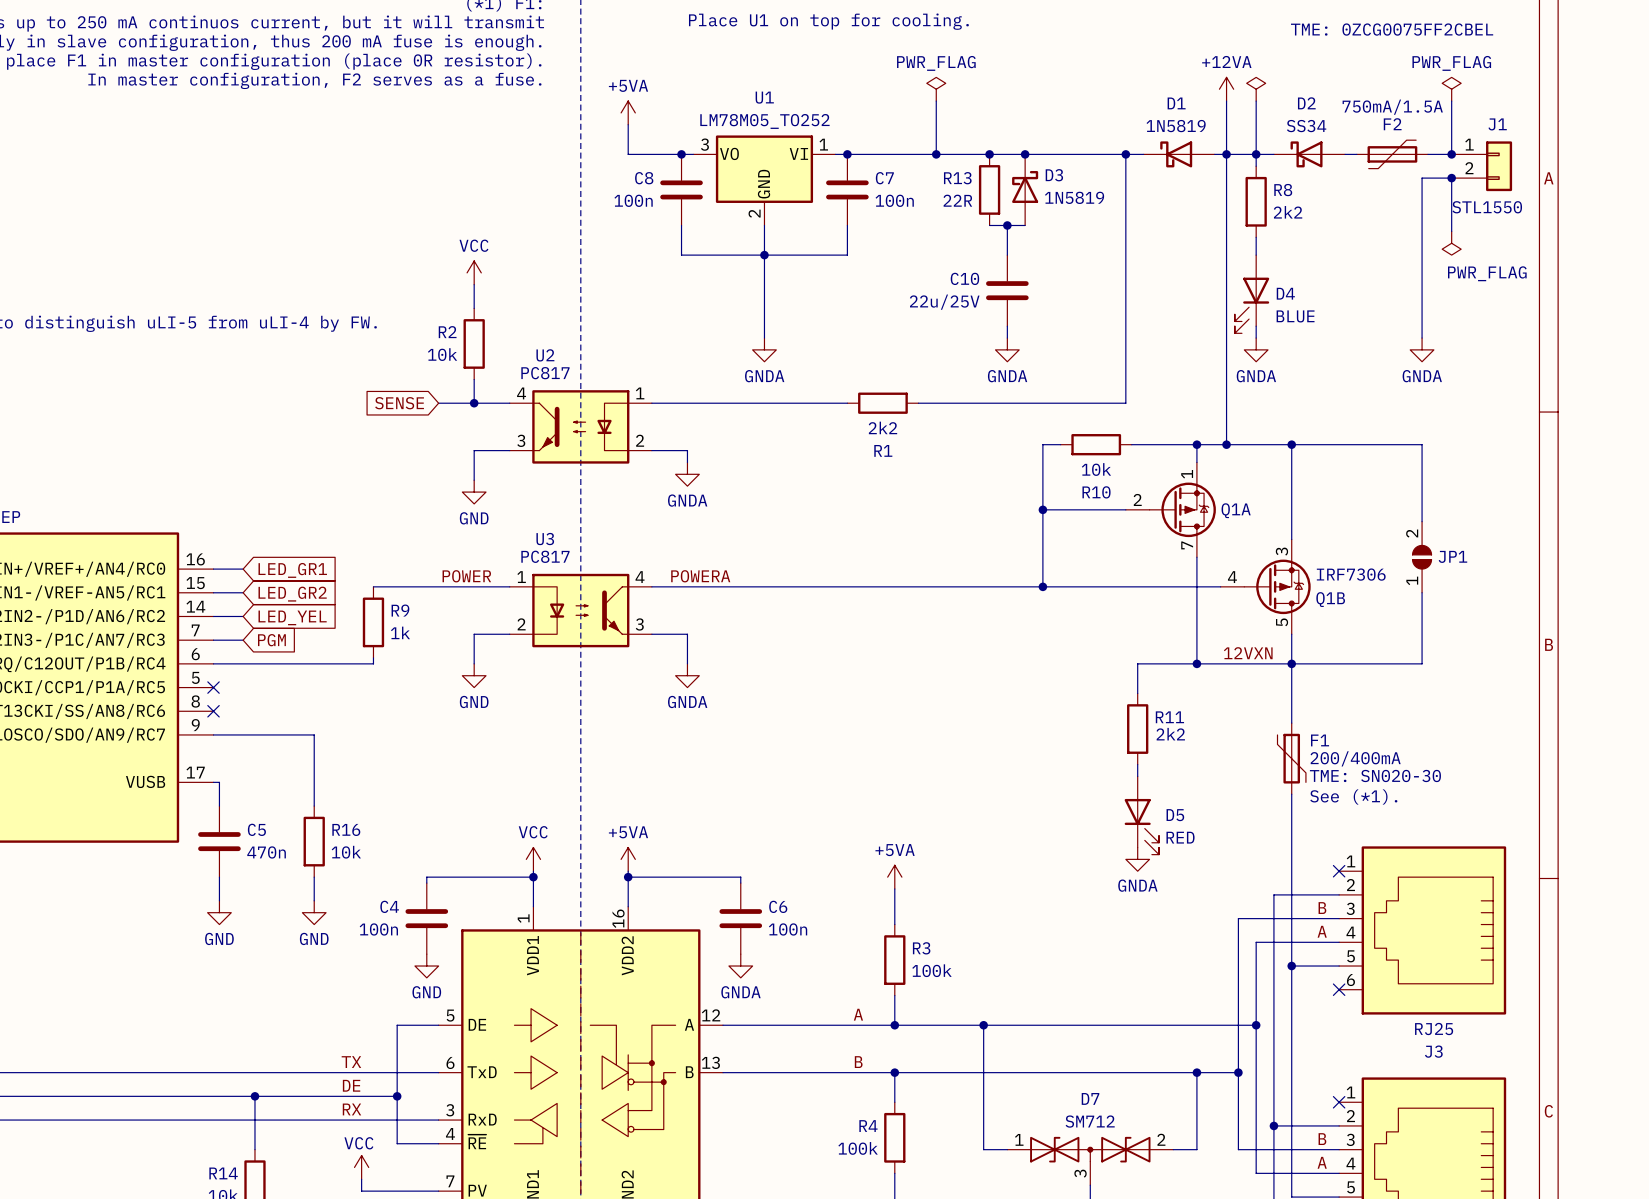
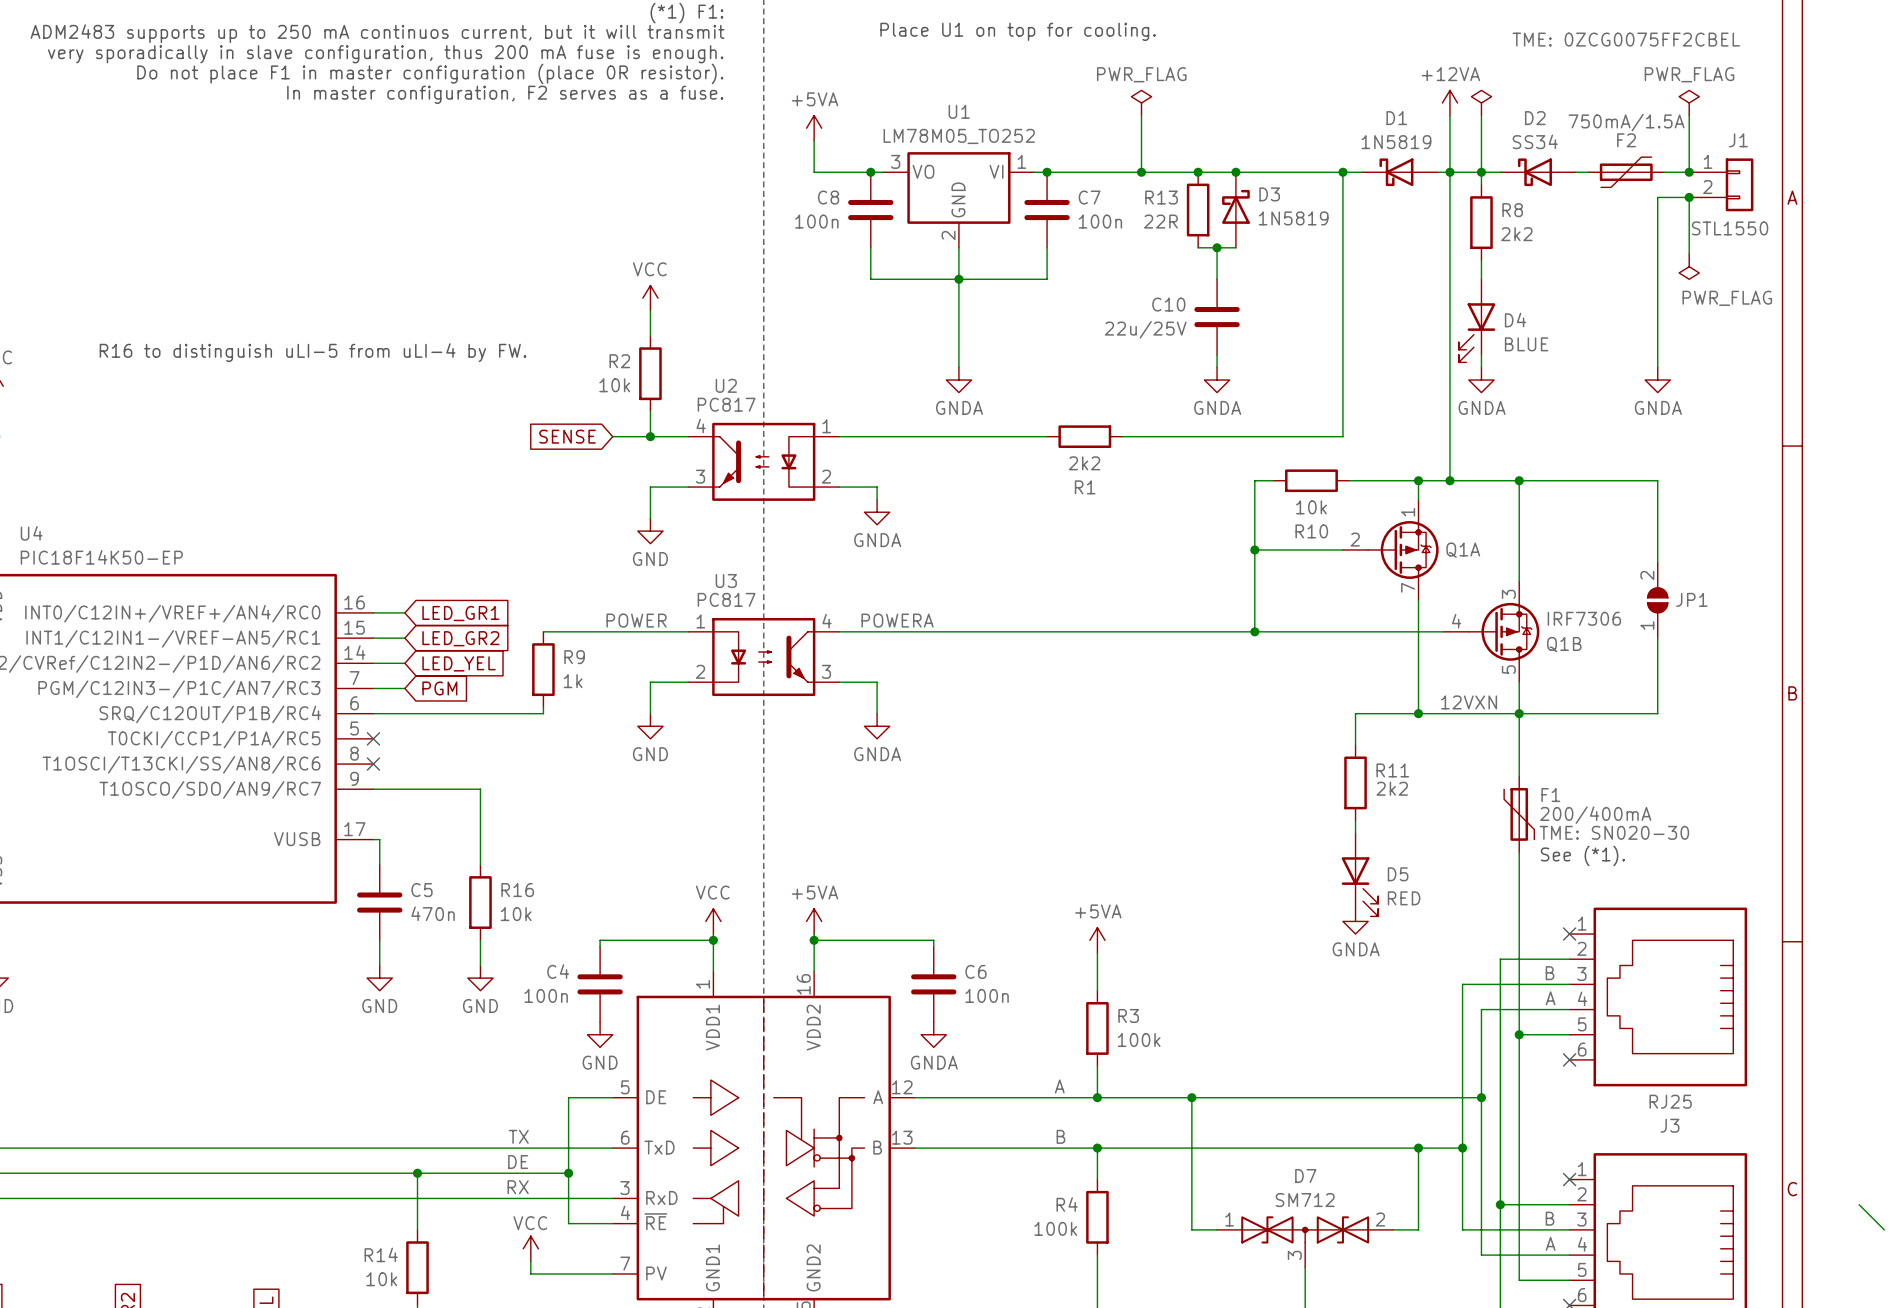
wire: none -> (1859, 1204) (1884, 1229)

